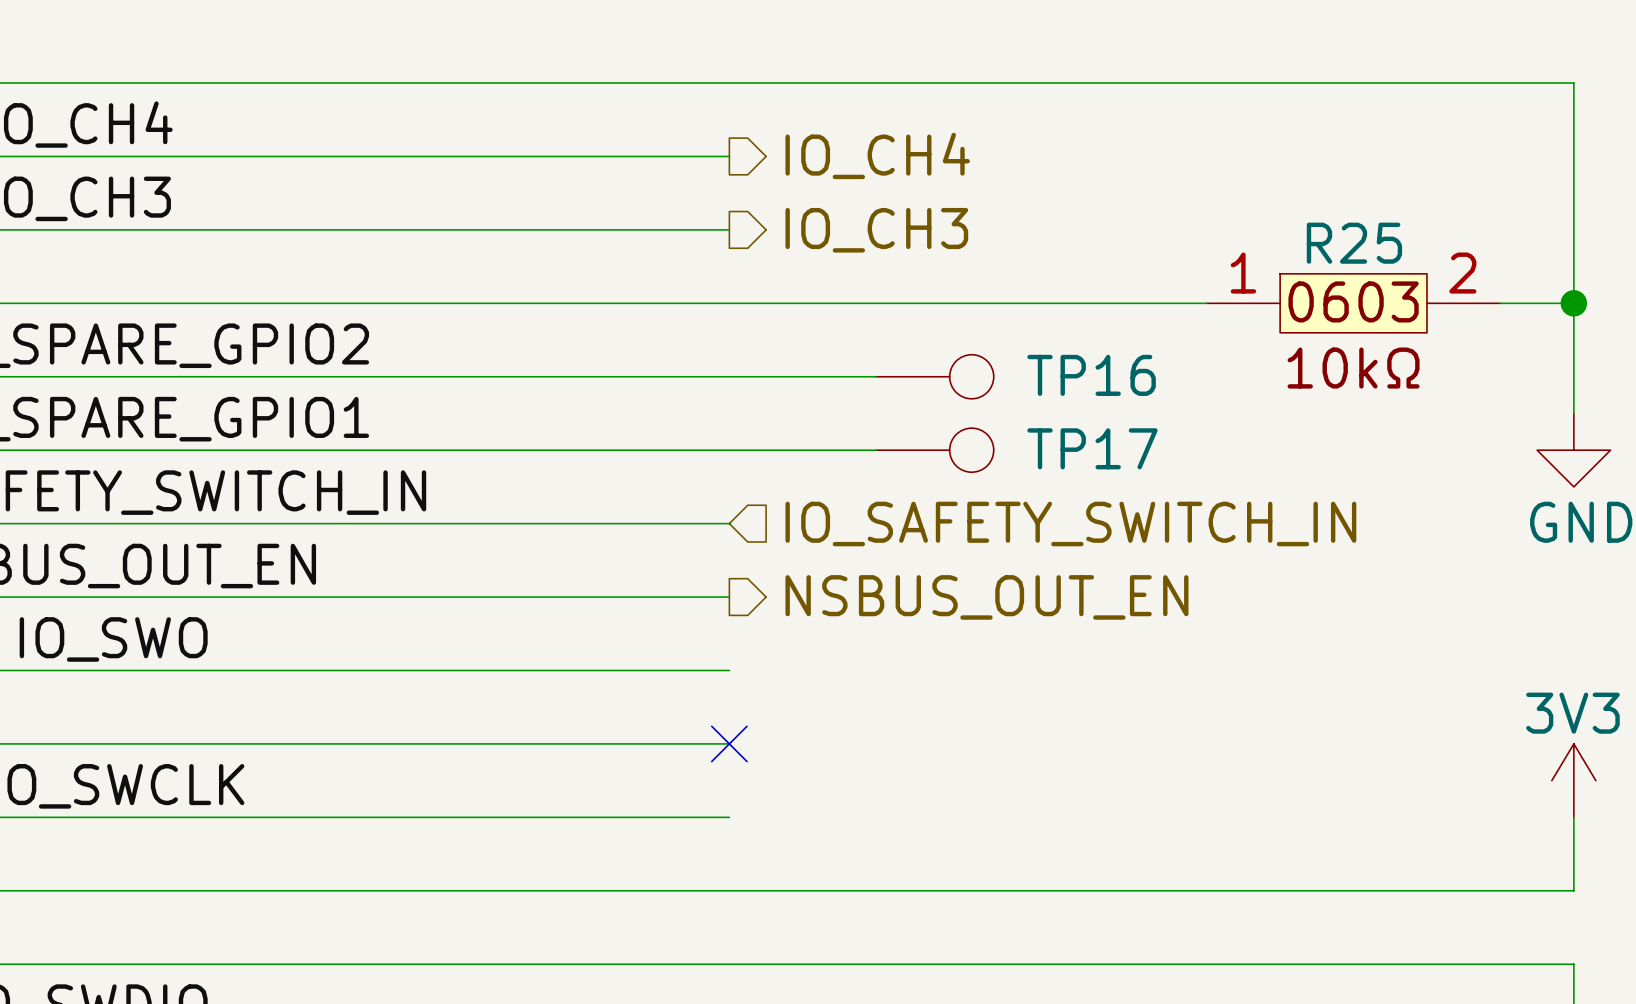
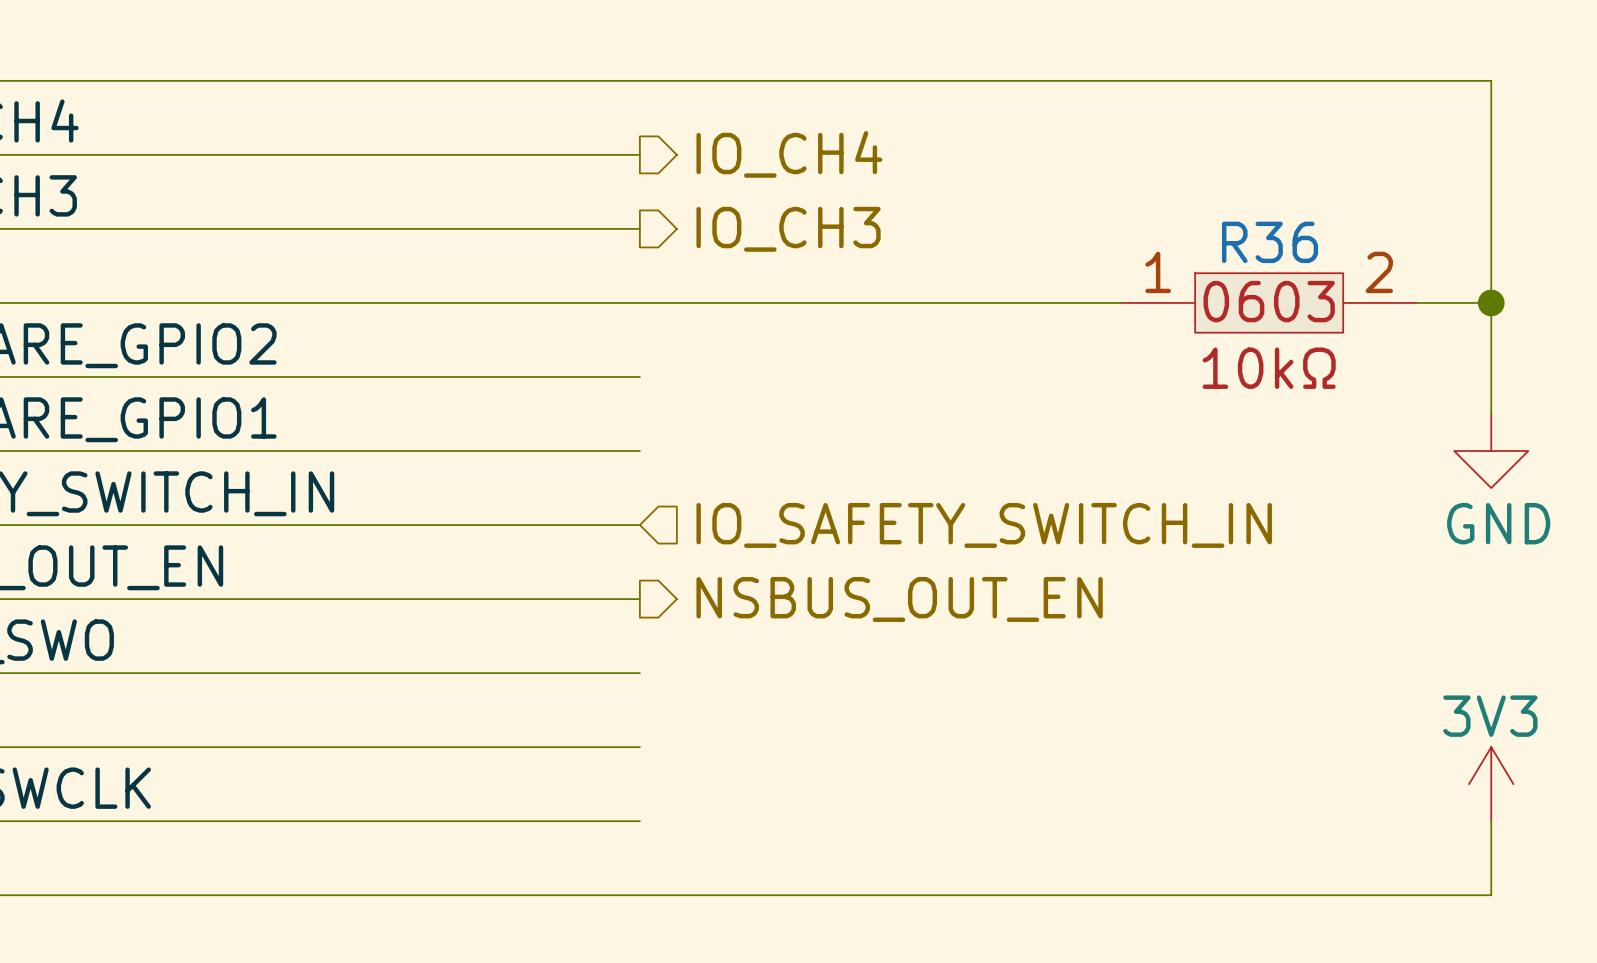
R25 name: R25 (1354, 243) -> R36 (1270, 242)
wire: (729, 376) (876, 376) -> none
TP16: (934, 376) -> none
wire: (729, 450) (876, 450) -> none
TP17: (934, 450) -> none
no-connect mark: (729, 743) -> none

